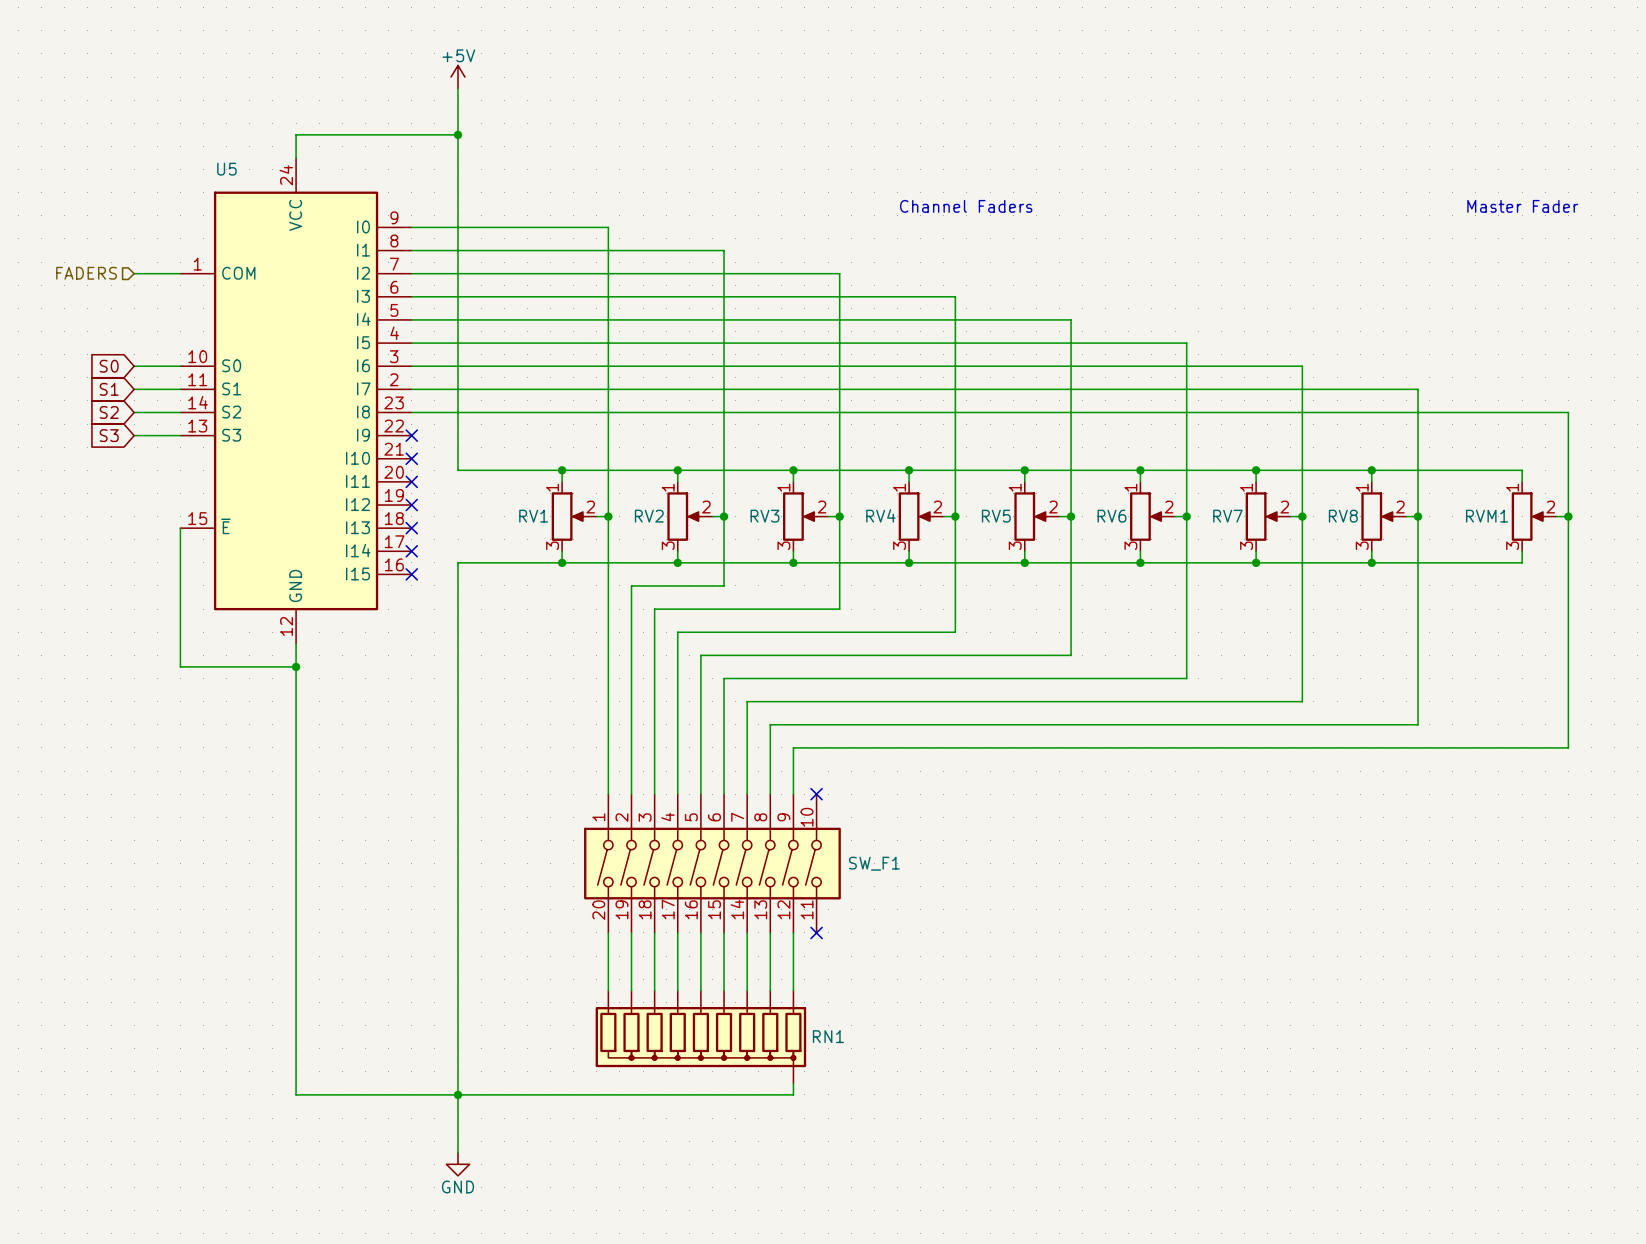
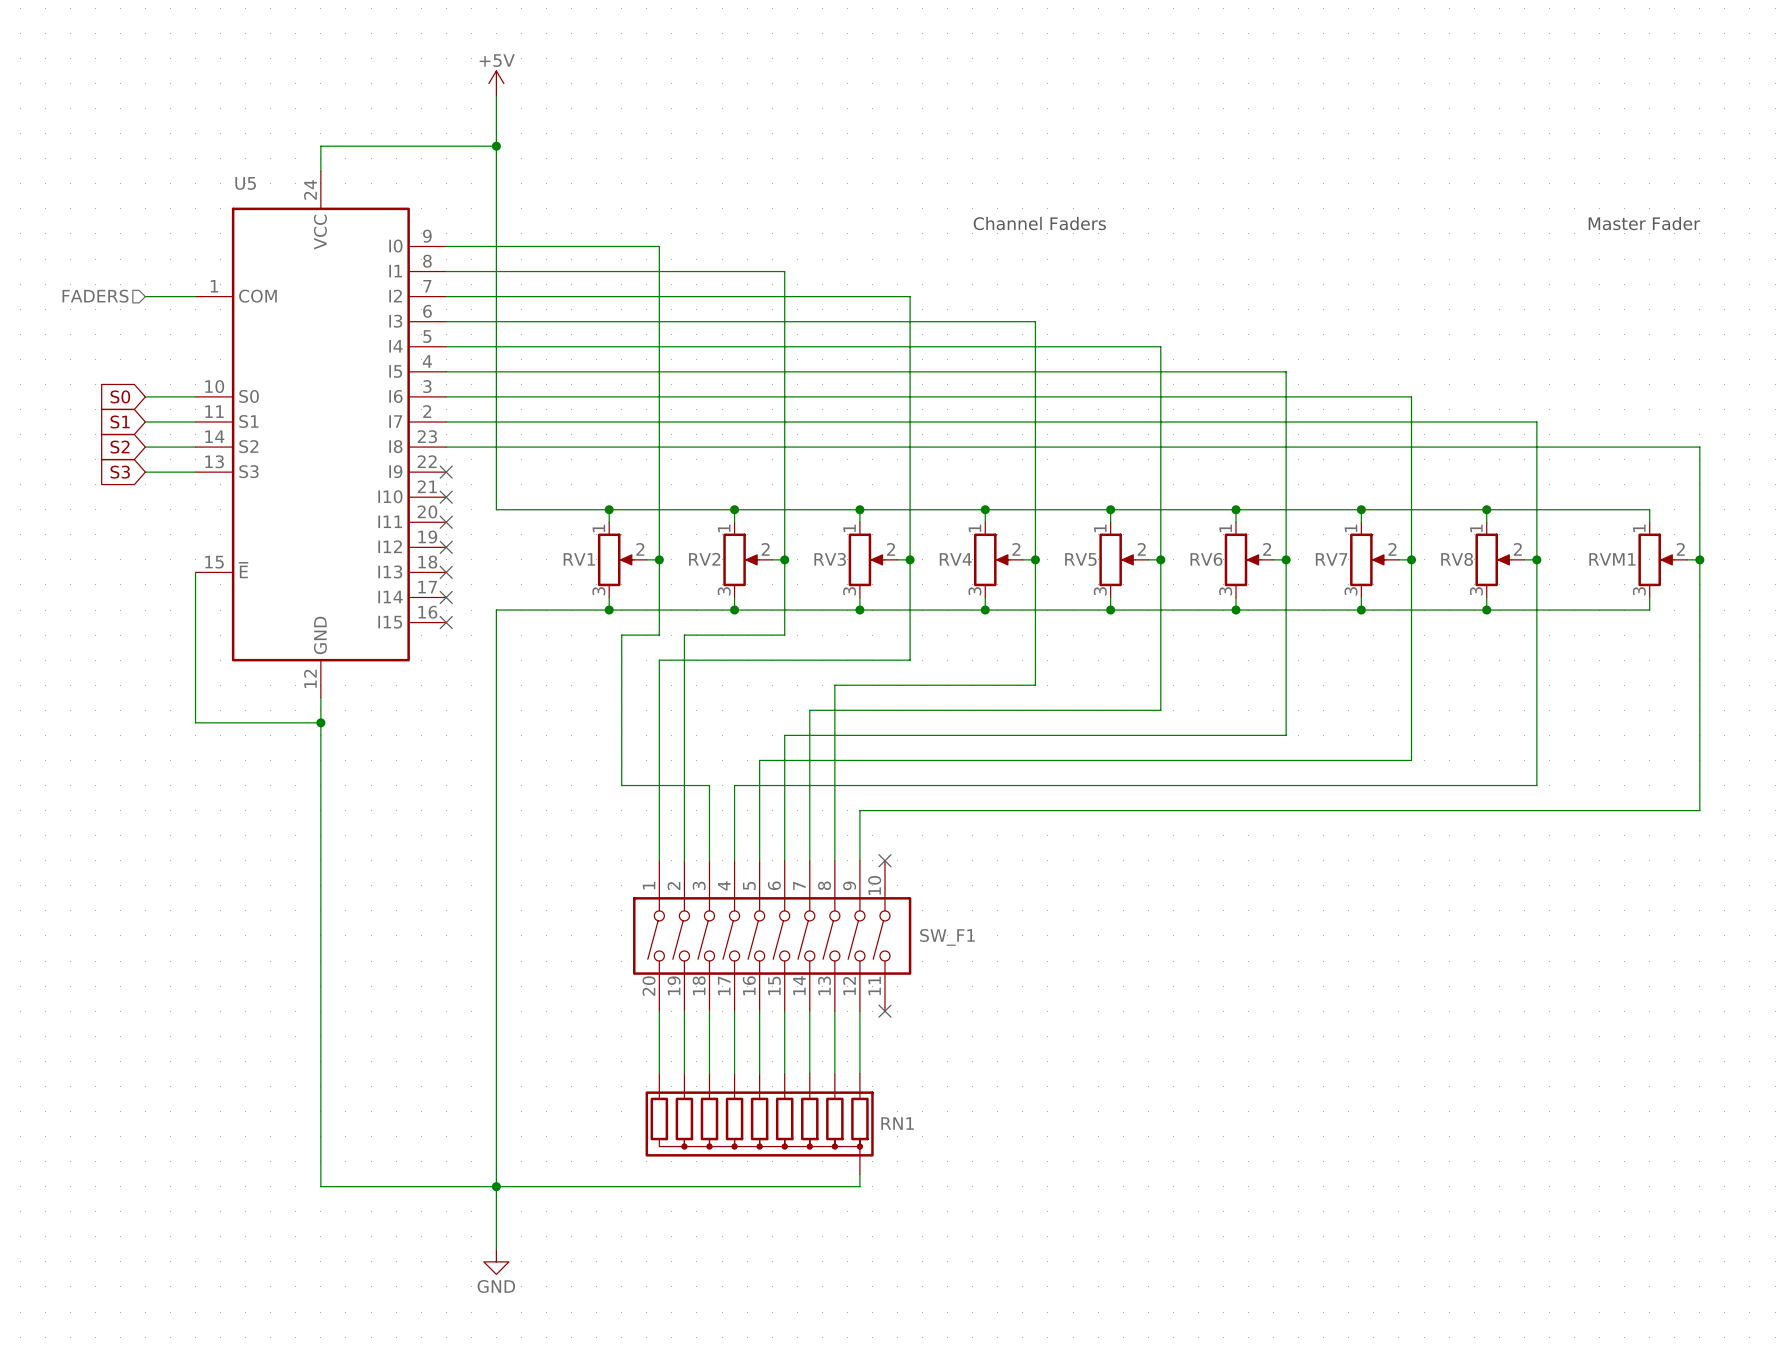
wire: (608, 585) (608, 609) -> (709, 660) (659, 660)
wire: (654, 609) (654, 724) -> (659, 635) (621, 635) (621, 785) (709, 785)
wire: (770, 632) (677, 632) (677, 724) -> (834, 685) (834, 785) (734, 785)
wire: (747, 655) (700, 655) (700, 701) -> (809, 710) (809, 760) (759, 760)

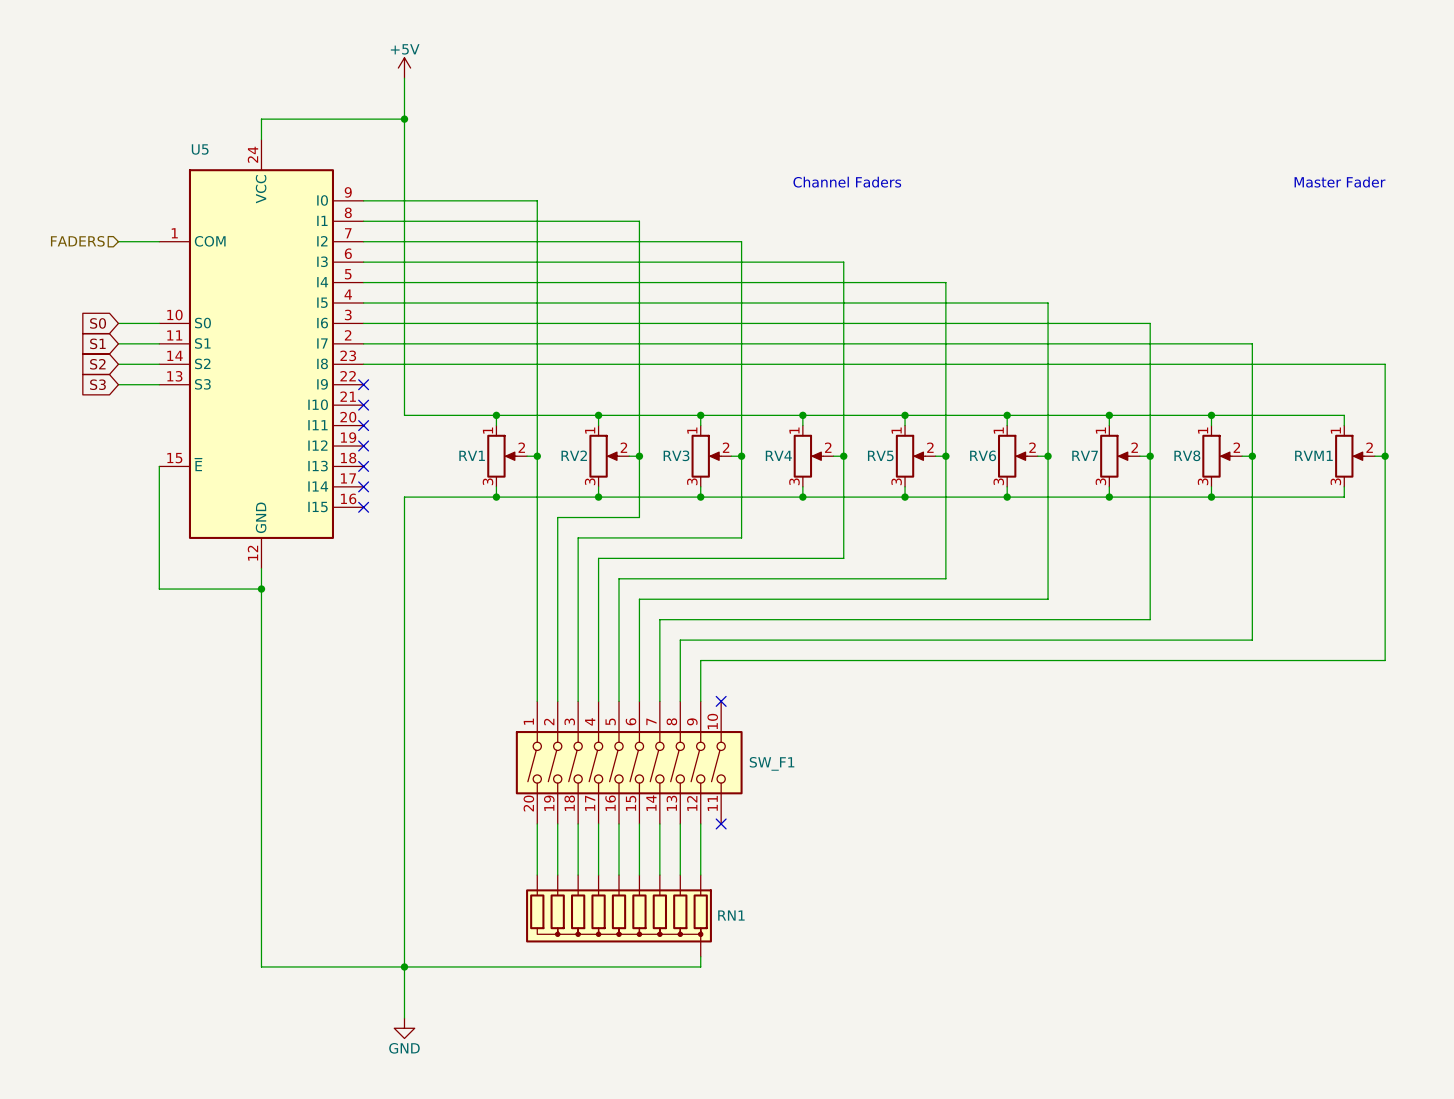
wire: (659, 635) (621, 635) (621, 785) (709, 785) -> (578, 537) (578, 640)
wire: (659, 660) (709, 660) -> (537, 537) (537, 517)
wire: (834, 685) (834, 785) (734, 785) -> (680, 558) (598, 558) (598, 640)
wire: (809, 710) (809, 760) (759, 760) -> (659, 578) (619, 578) (619, 619)

